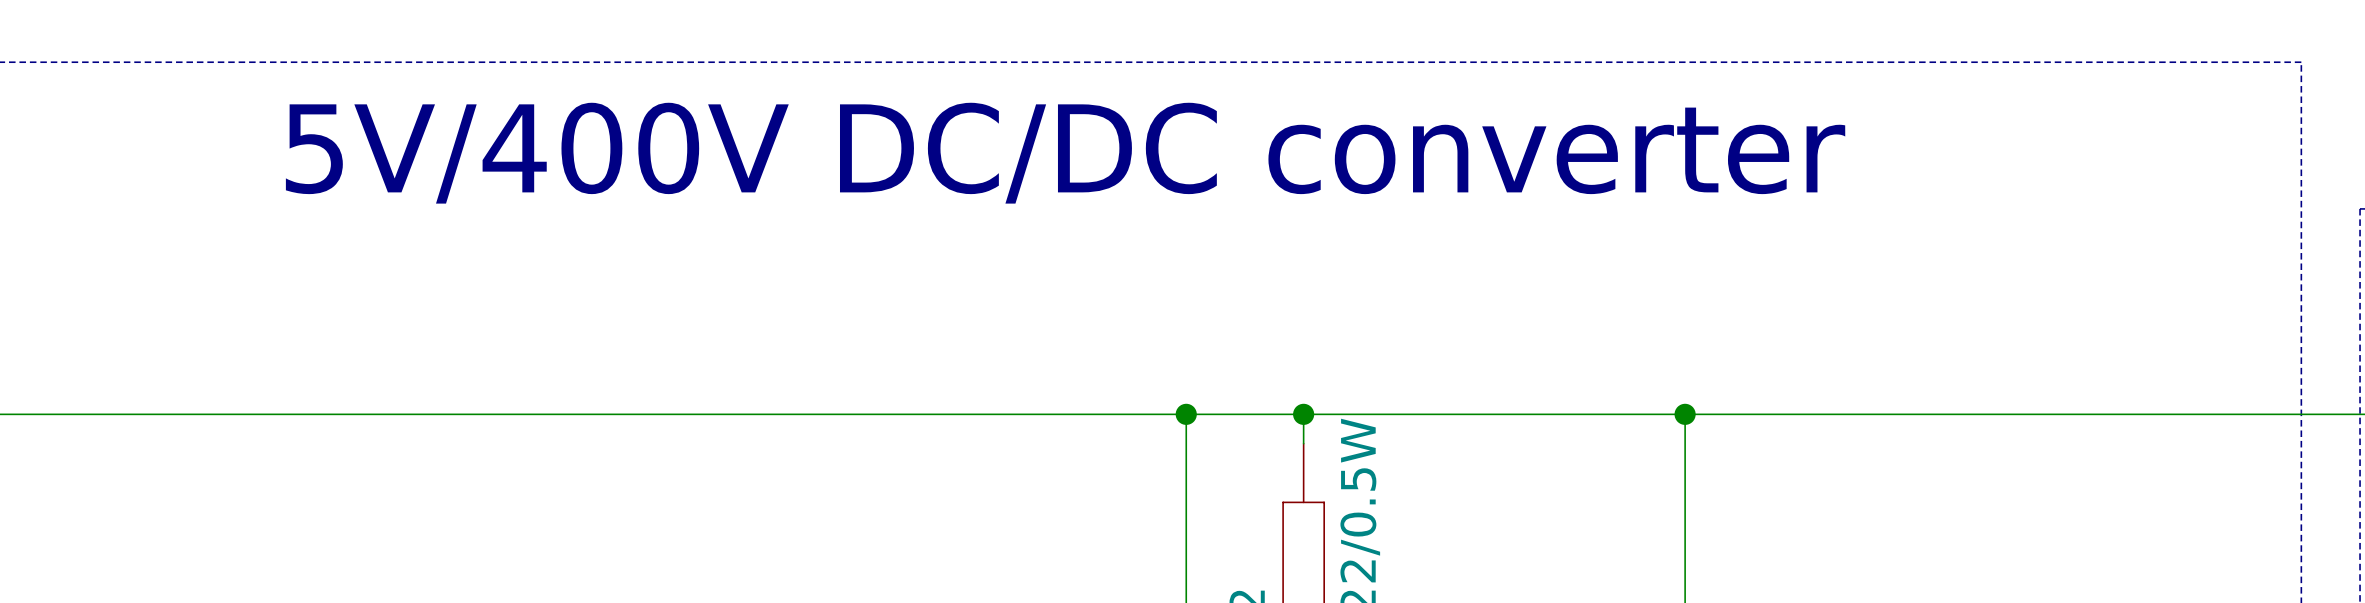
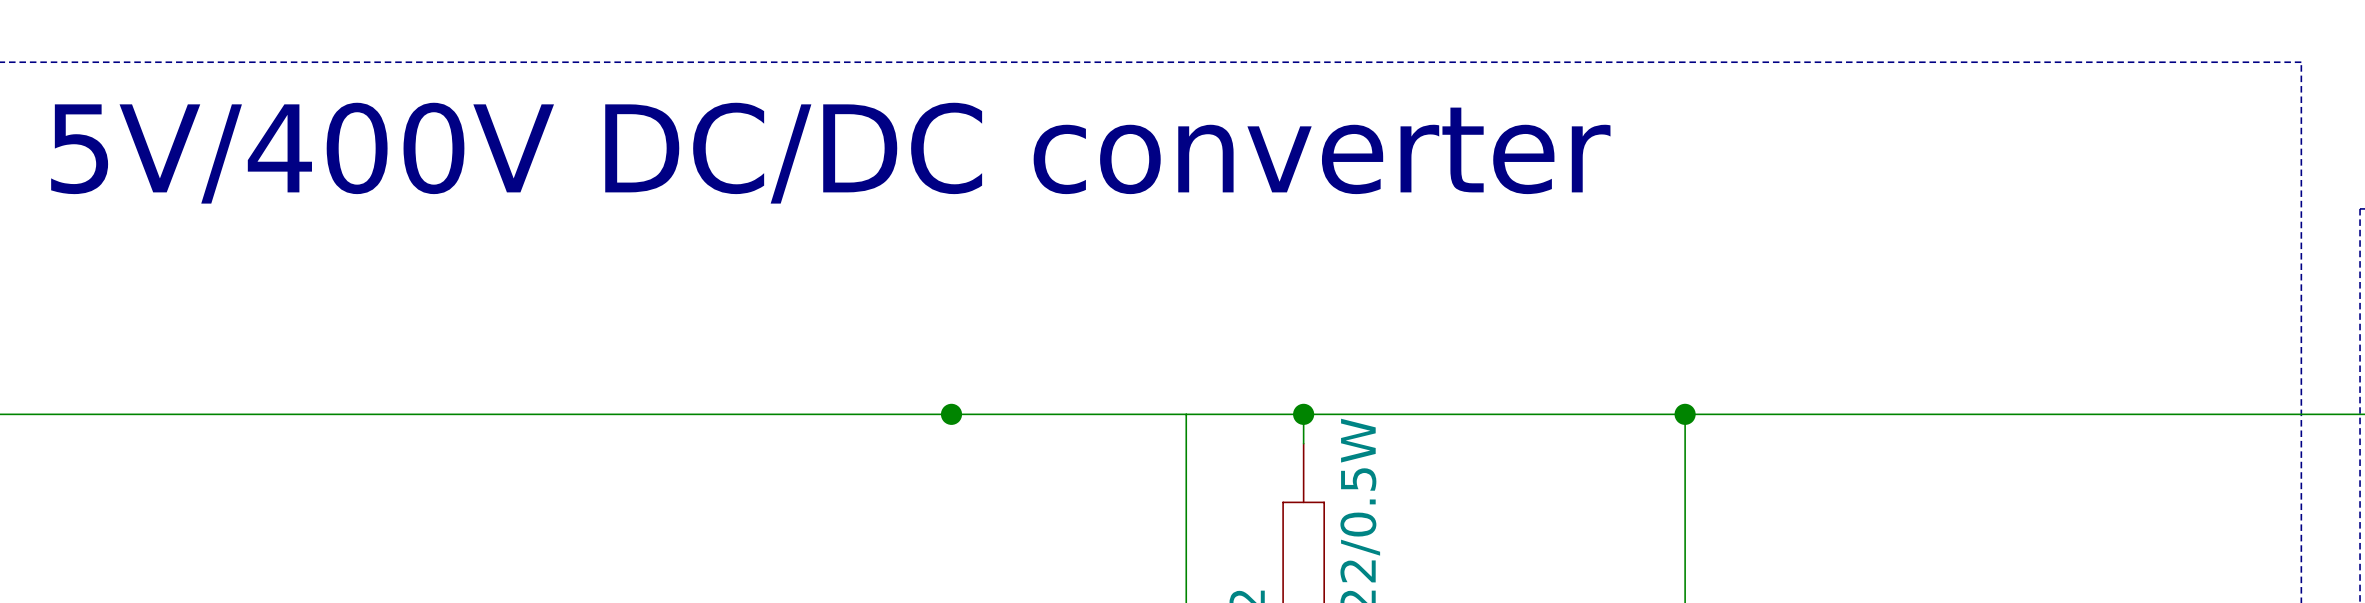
text position: 5V/400V DC/DC converter (1065, 153) -> 5V/400V DC/DC converter (830, 153)
junction: none -> (951, 414)
junction: (1186, 414) -> none

